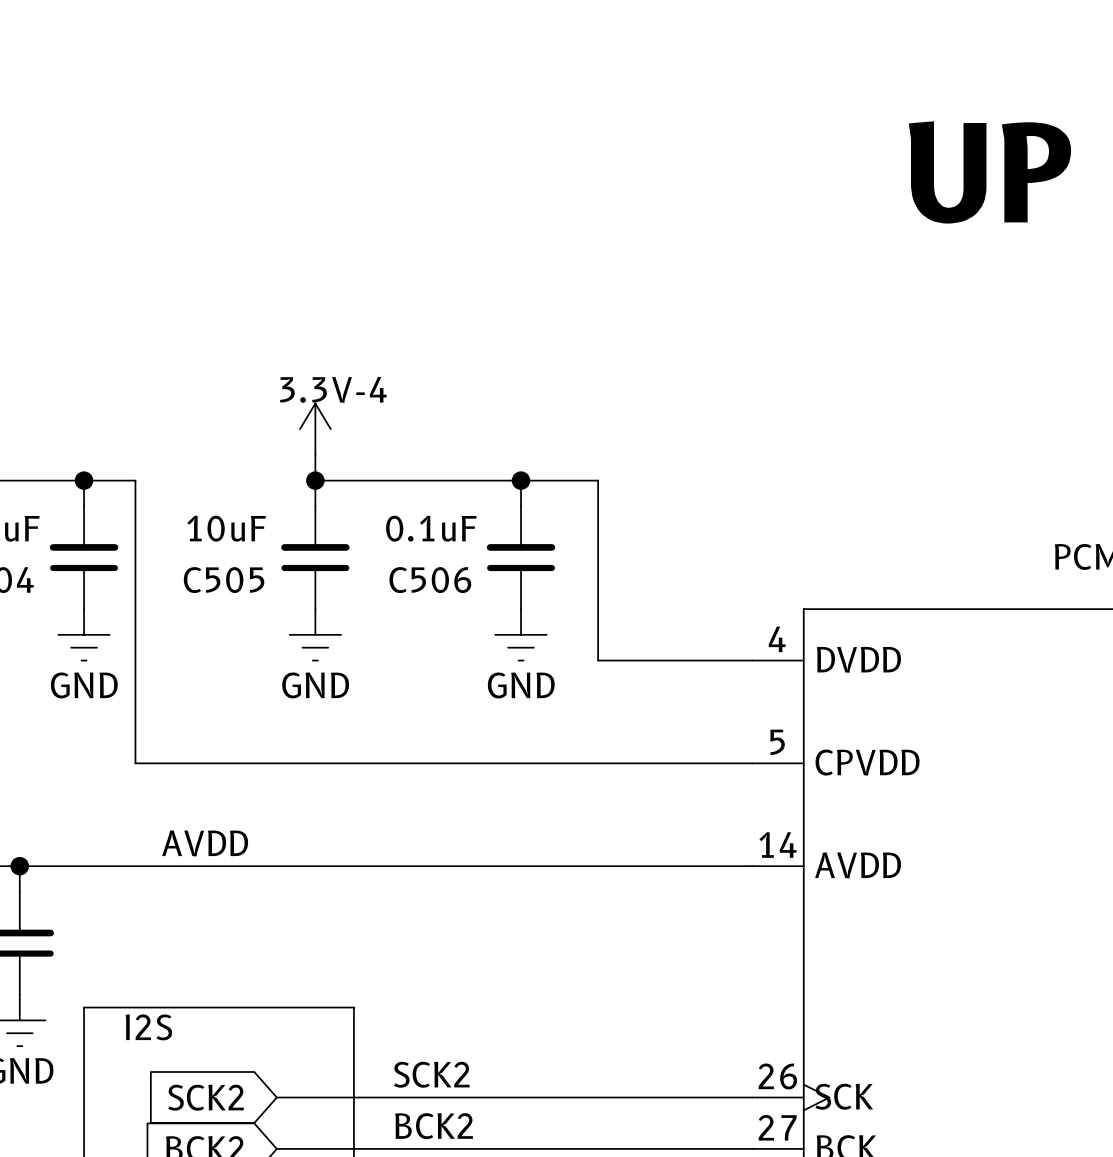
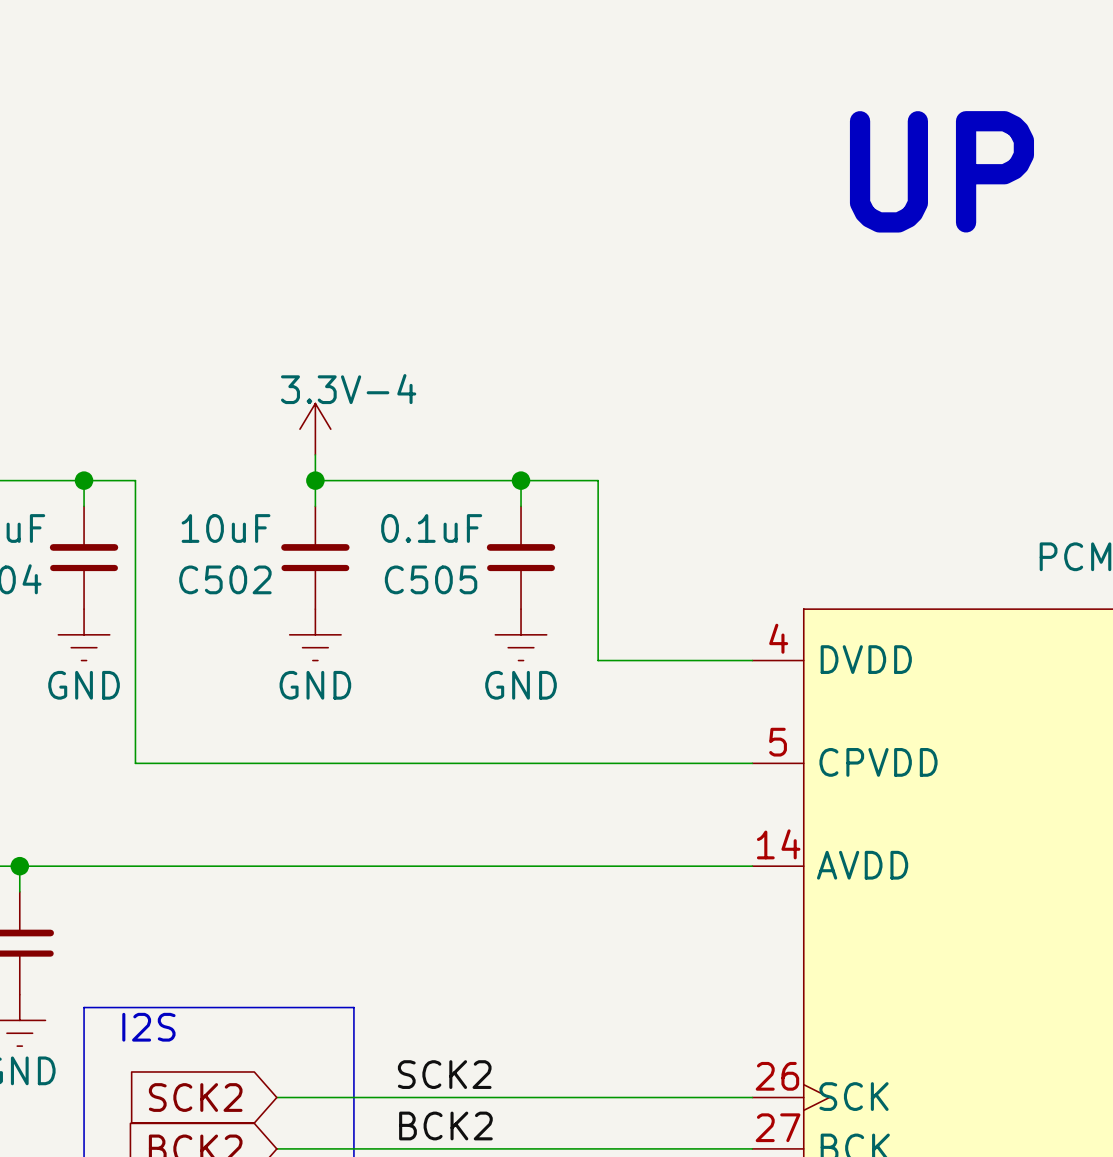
C505 name: C505 (224, 580) -> C502 (225, 579)
C506 name: C506 (430, 580) -> C505 (431, 579)
label: AVDD (205, 843) -> none

